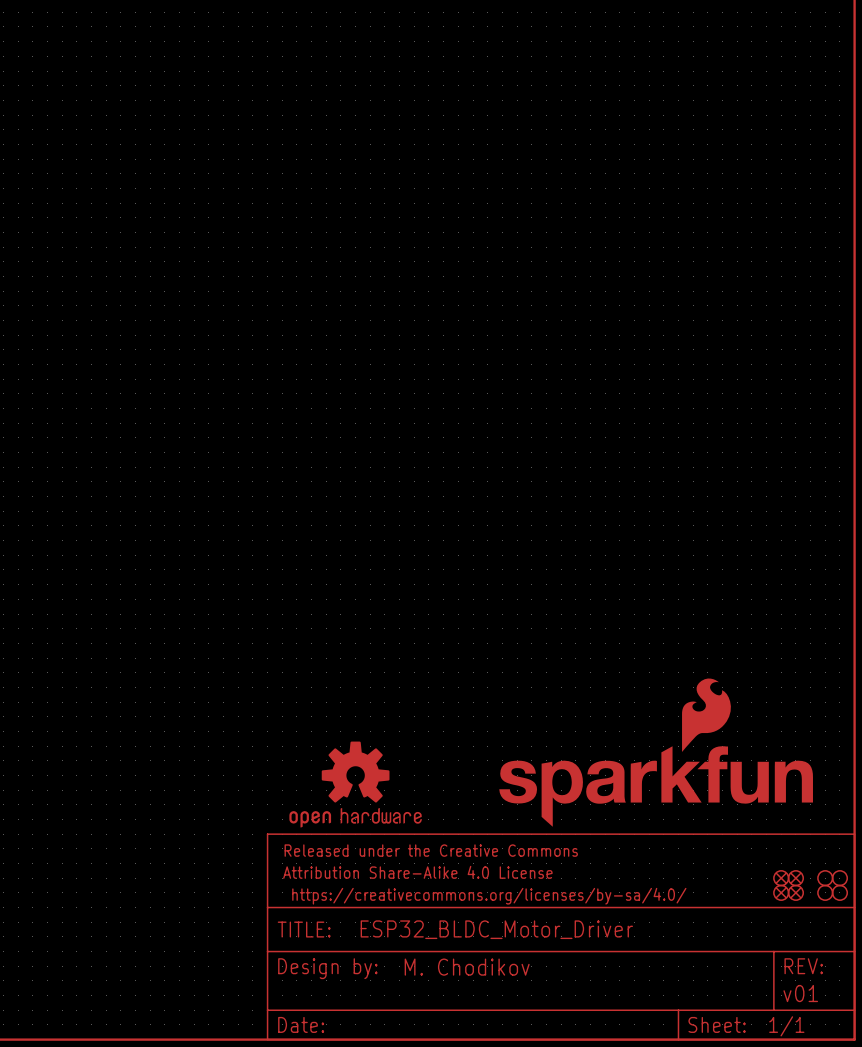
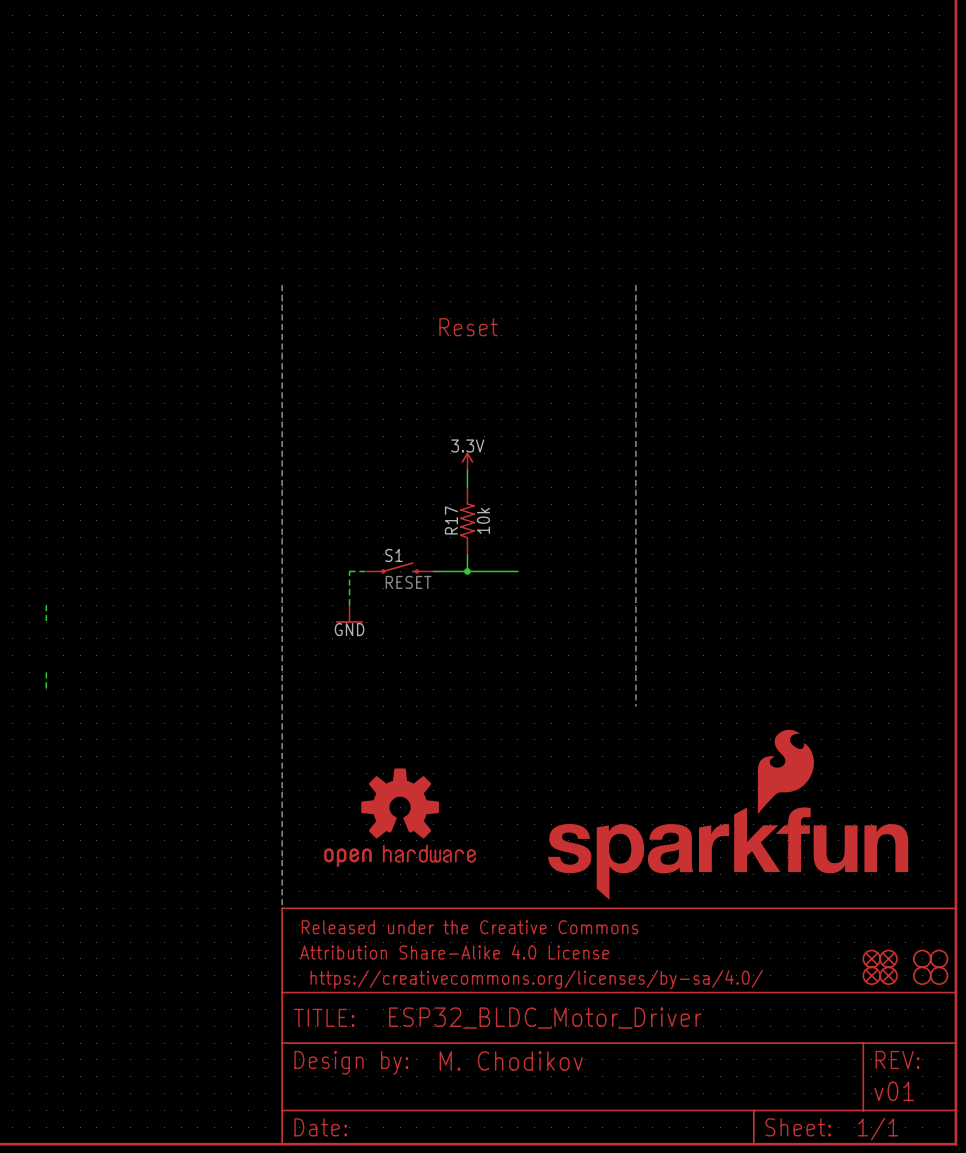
line: none -> (282, 285) (282, 908)
line: none -> (635, 285) (635, 706)
text: none -> Reset (468, 327)
power symbol: none -> 3.3V (467, 461)
wire: none -> (467, 470) (467, 487)
R17: none -> 10k (467, 520)
wire: none -> (467, 554) (467, 571)
S1: none -> (400, 567)
wire: none -> (366, 571) (349, 571) (349, 605)
wire: none -> (433, 571) (517, 571)
junction: none -> (467, 571)
text: none -> RESET (408, 582)
wire: none -> (46, 605) (46, 622)
power symbol: none -> GND (349, 614)
wire: none -> (46, 672) (46, 689)
part position: (355, 784) -> (400, 817)

